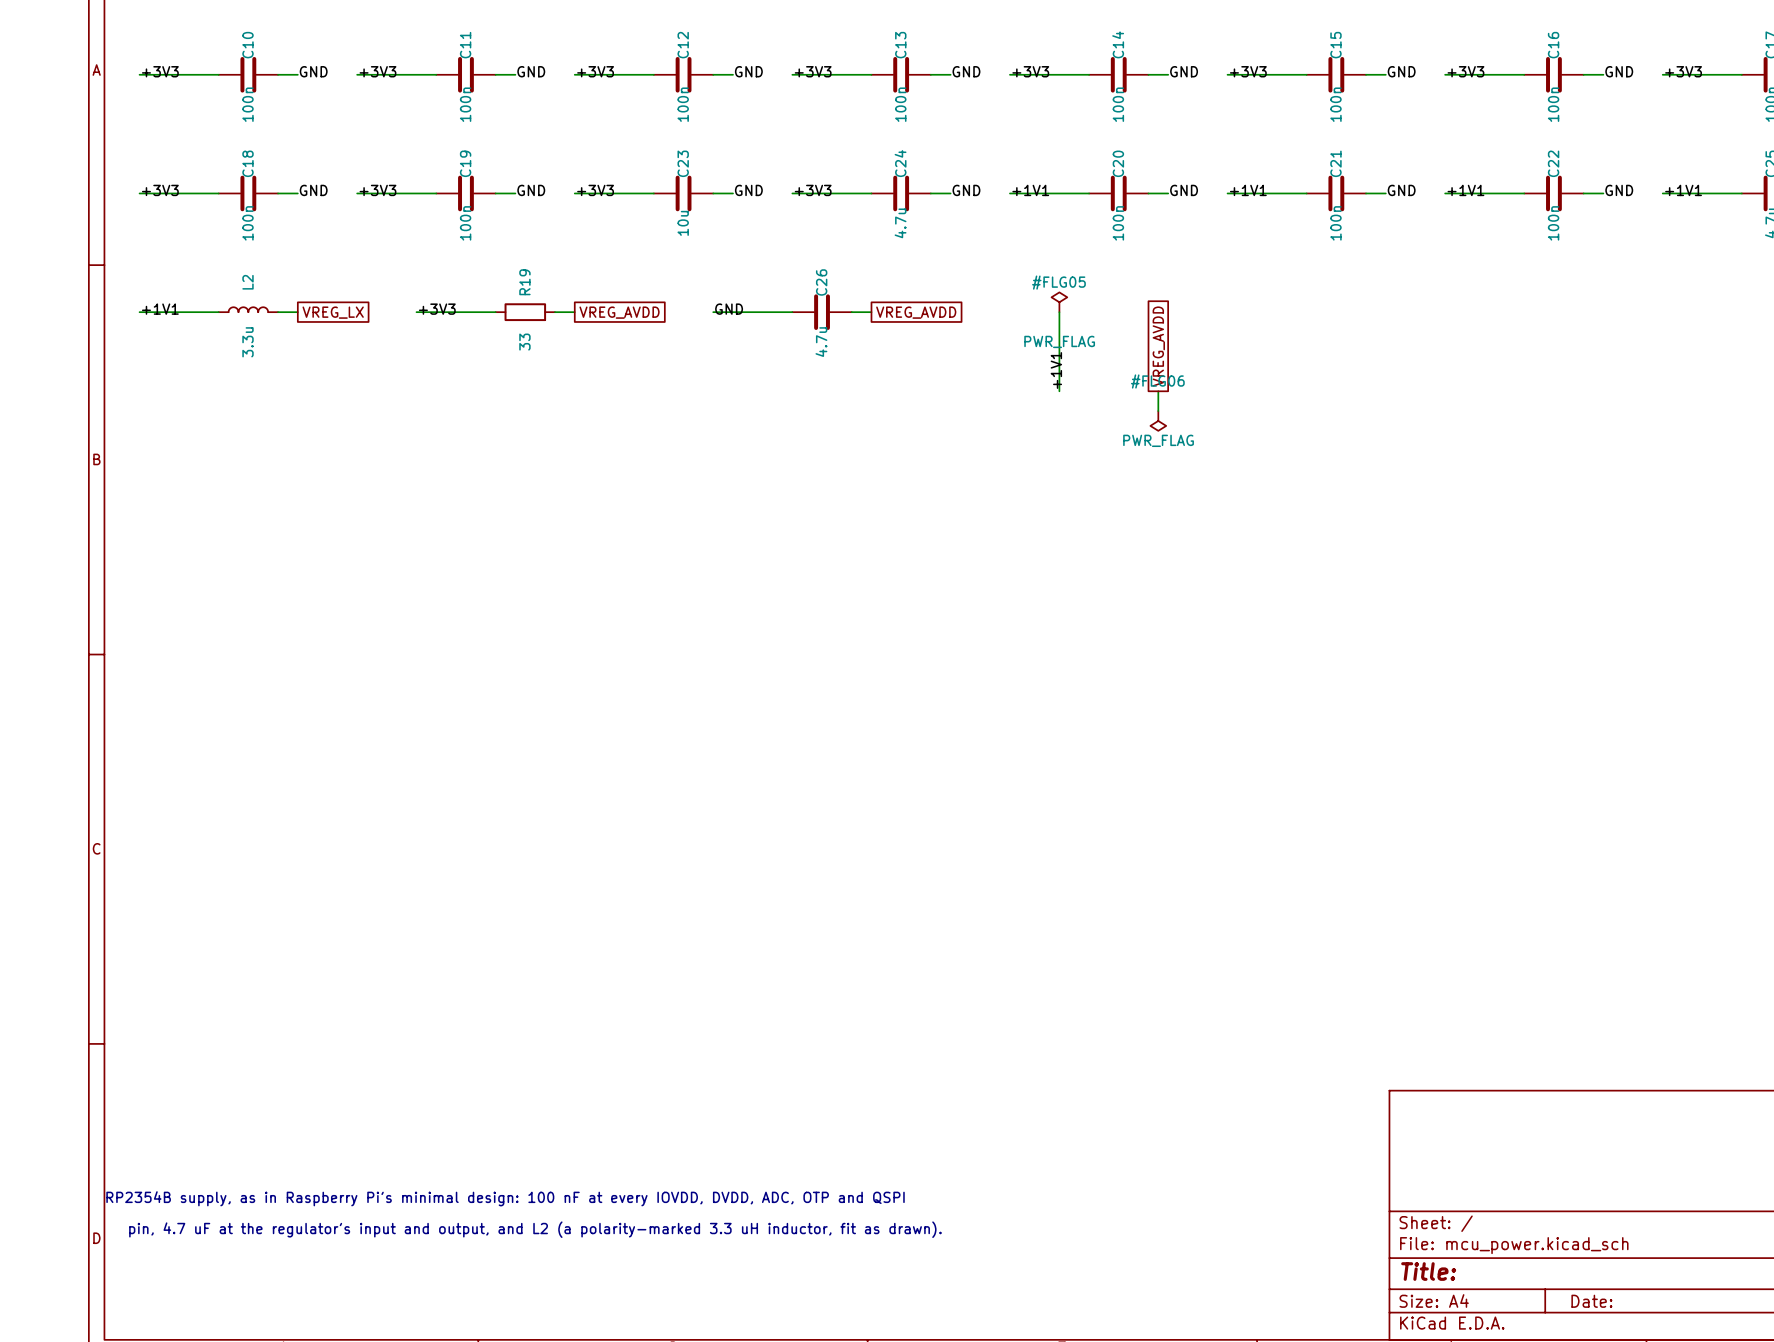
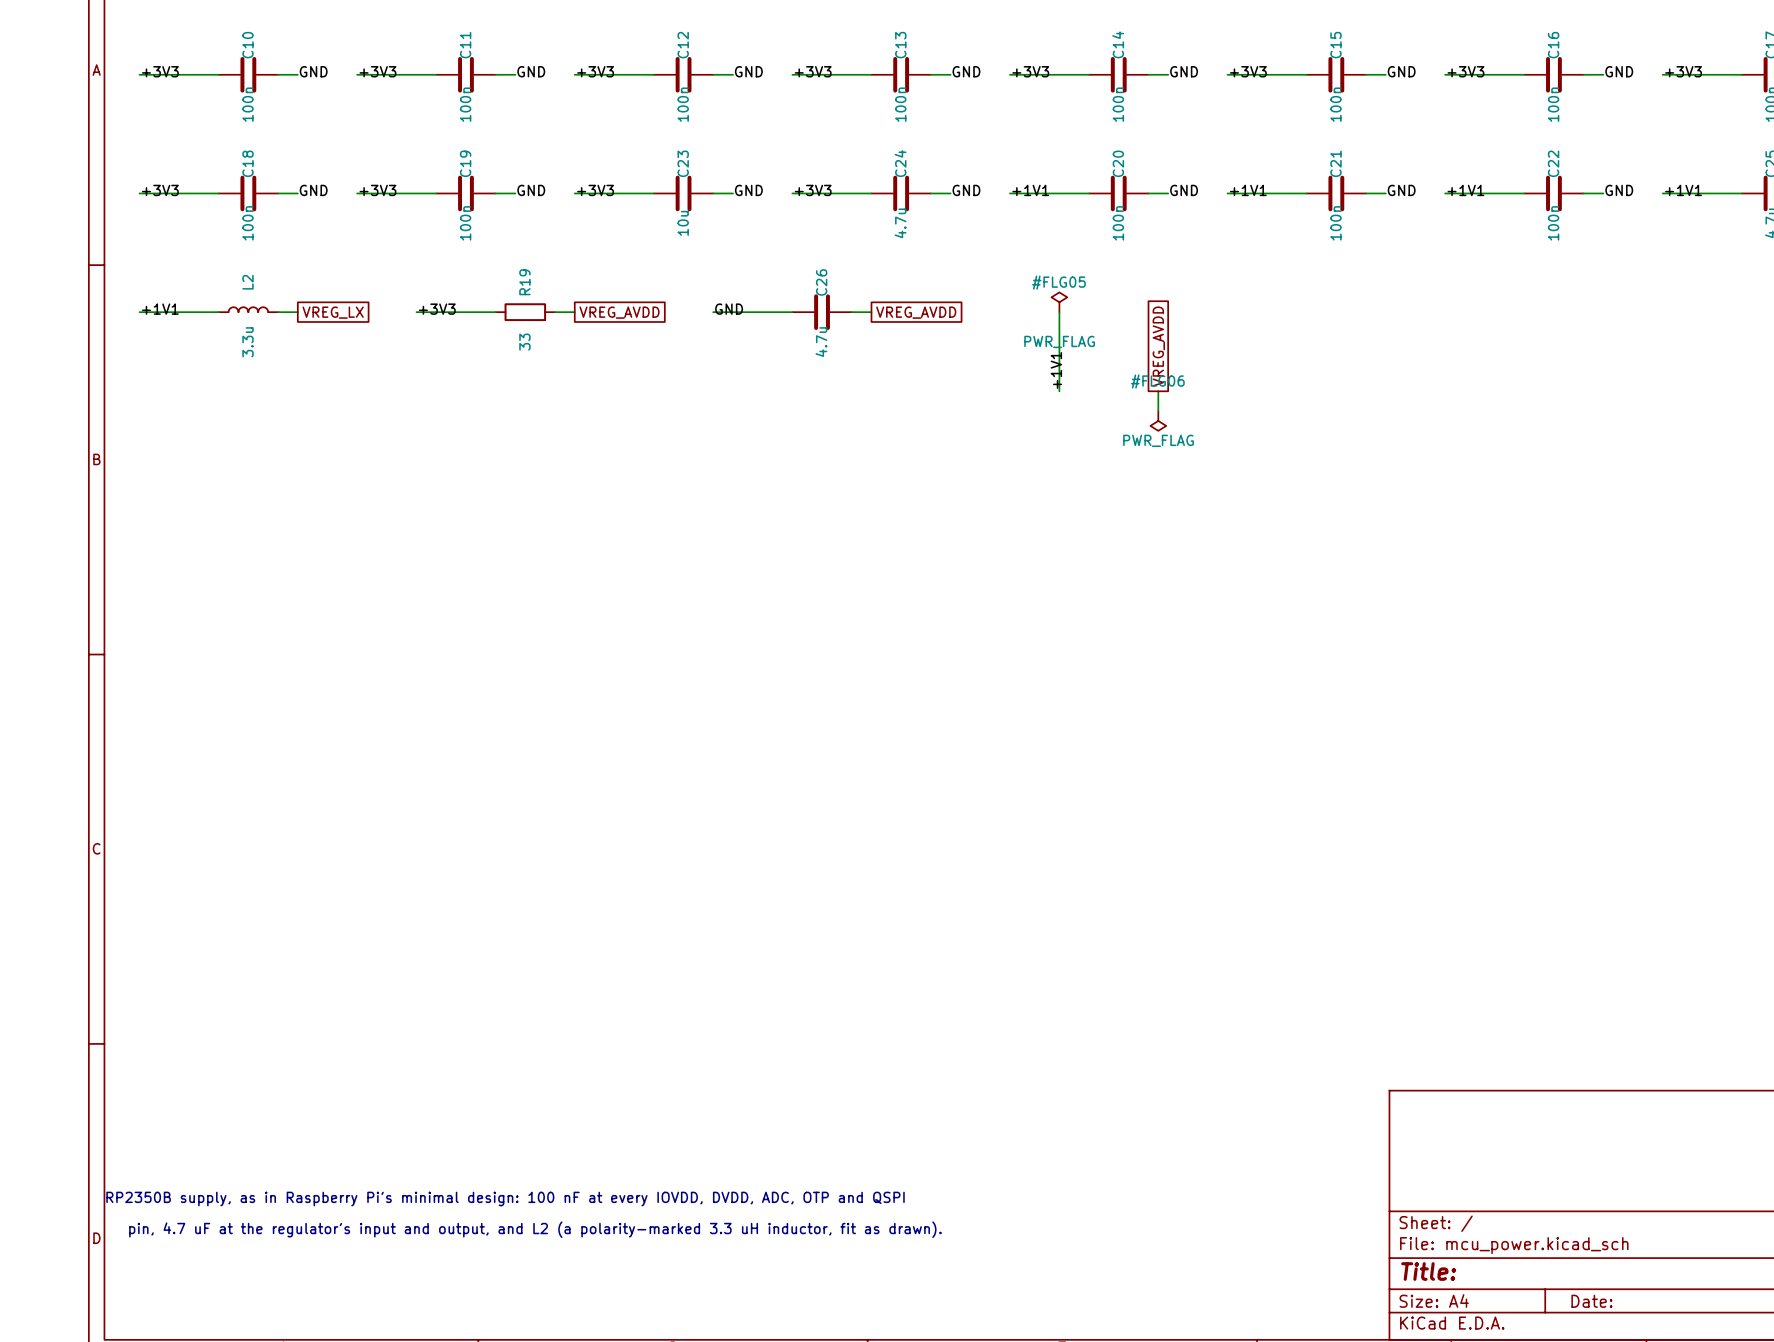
text: RP2354B supply, as in Raspberry Pi's minimal design: 100 nF at every IOVDD, DVDD, ADC, OTP and QSPI (505, 1198) -> RP2350B supply, as in Raspberry Pi's minimal design: 100 nF at every IOVDD, DVDD, ADC, OTP and QSPI (505, 1199)

